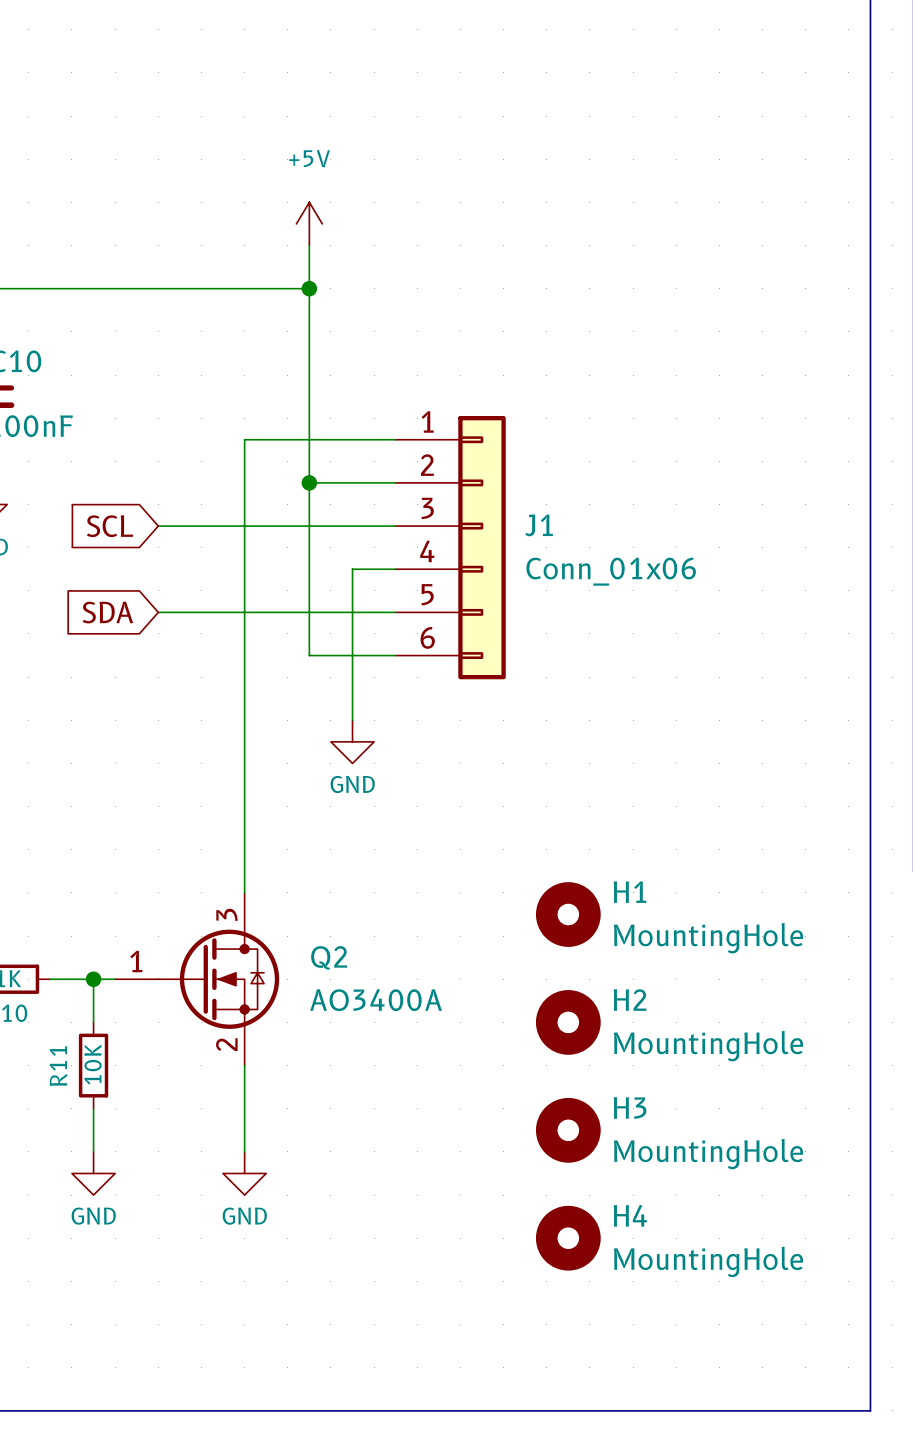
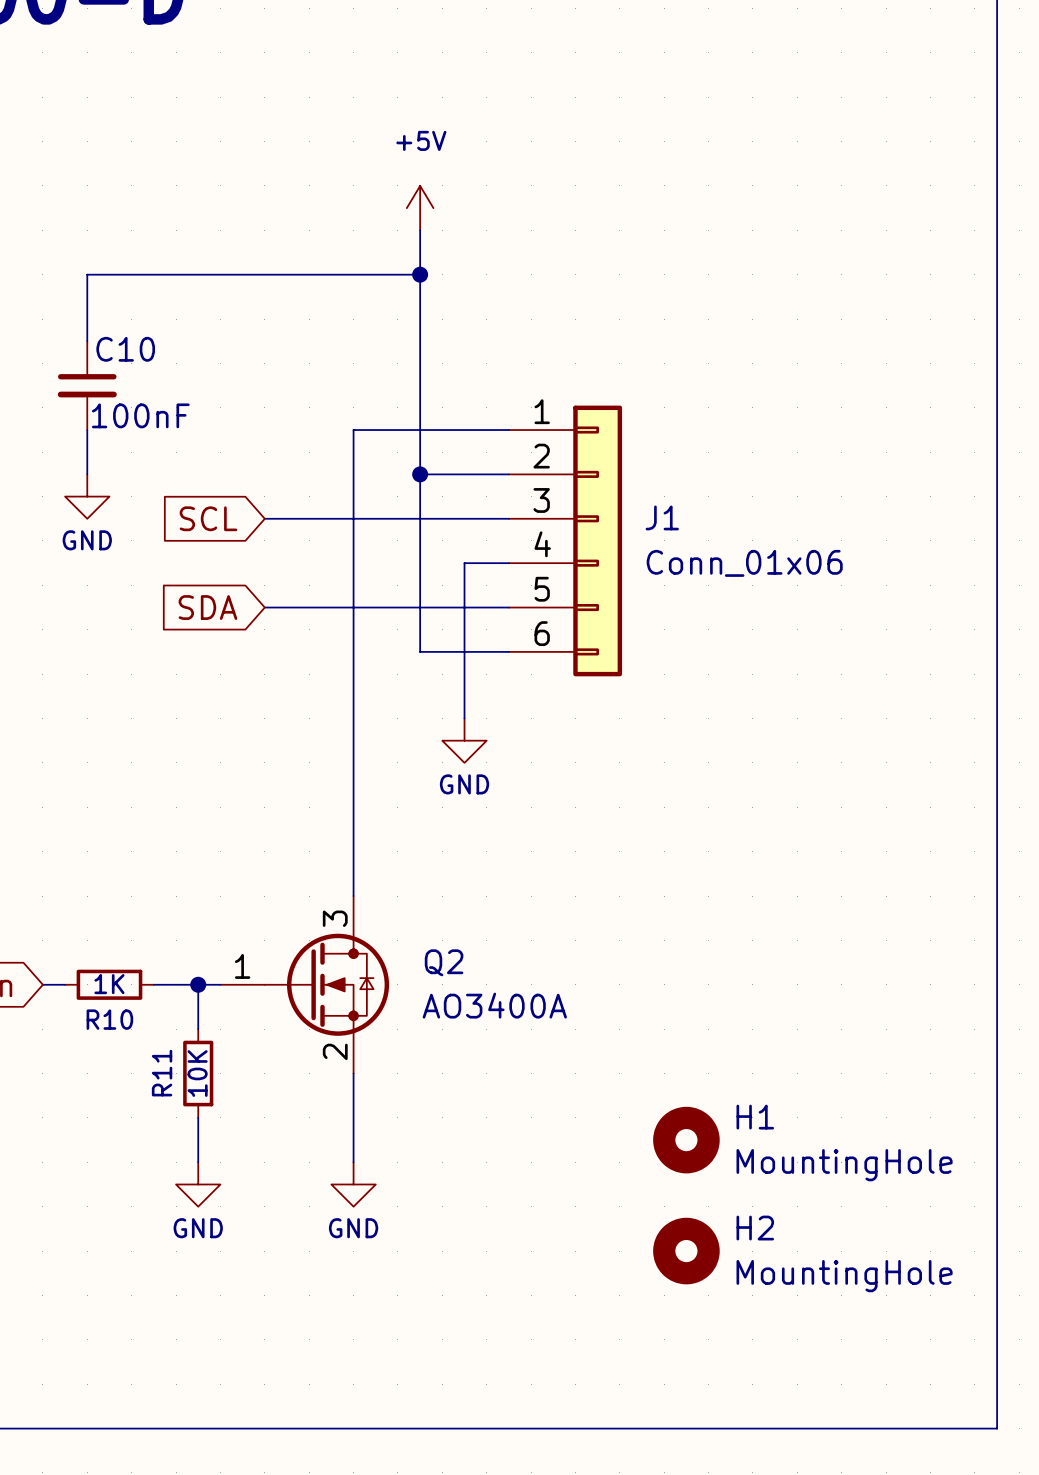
H1: MountingHole (568, 914) -> none
H2: MountingHole (568, 1022) -> none
H3 name: H3 (630, 1107) -> H1 (755, 1117)
H4 name: H4 (630, 1215) -> H2 (755, 1228)

